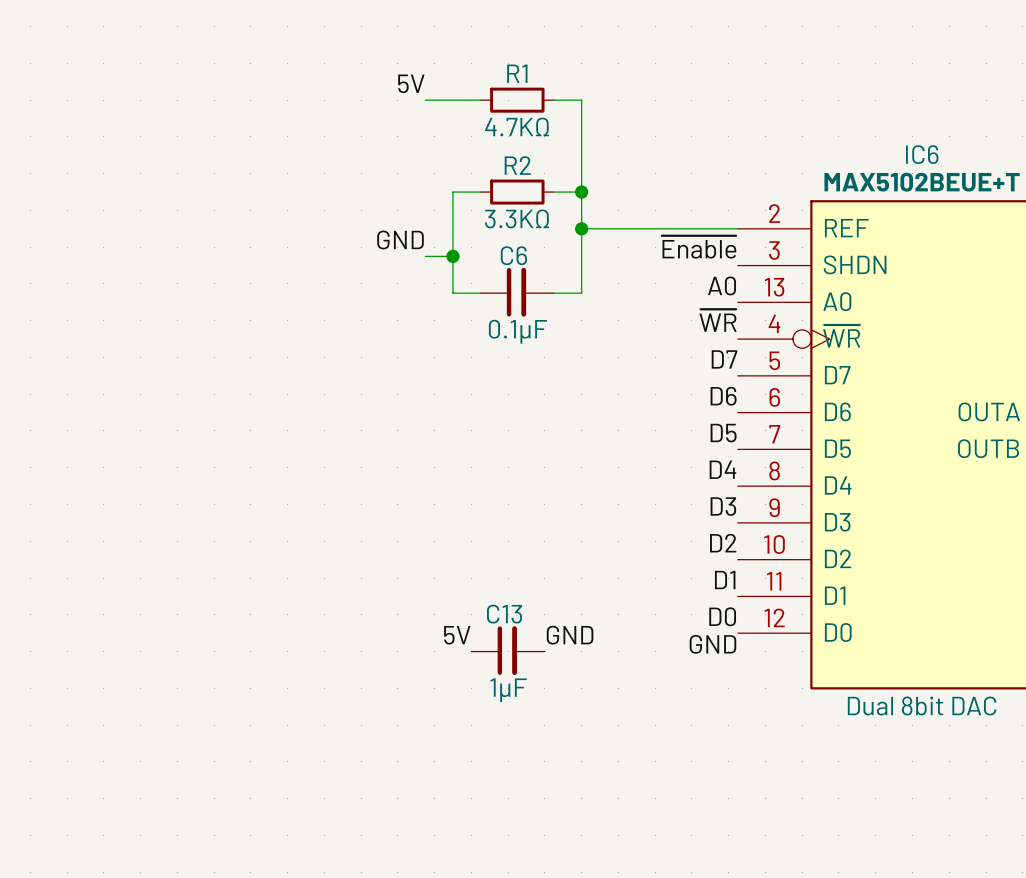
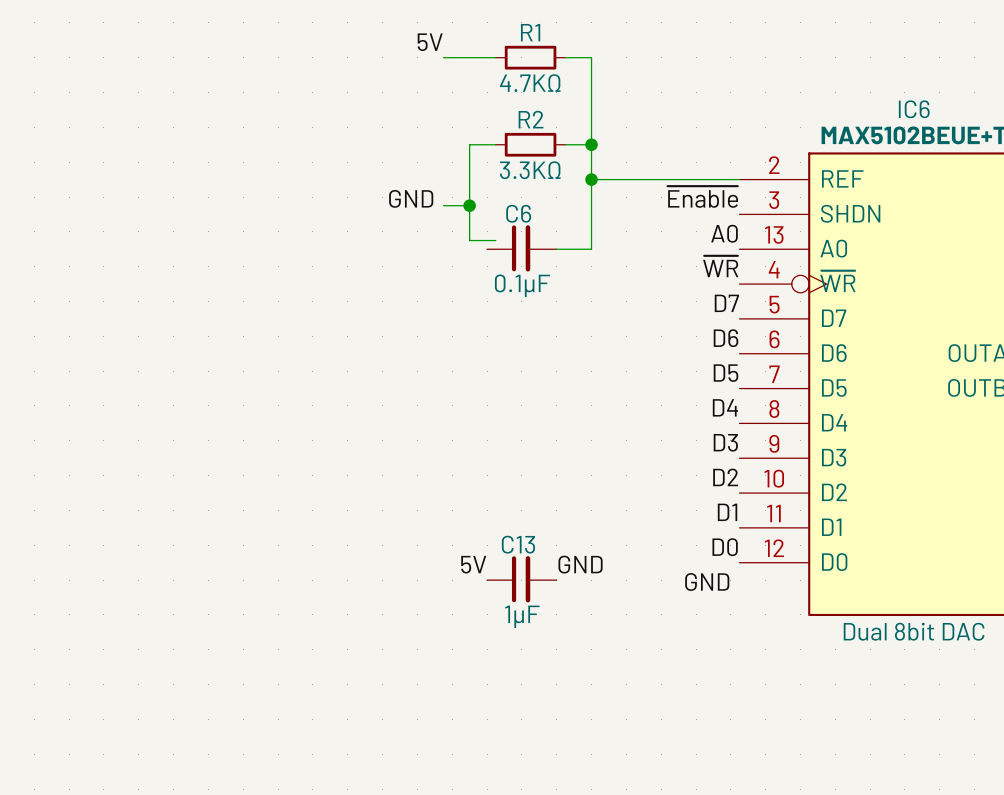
label position: GND (400, 239) -> GND (411, 198)
C6 position: (517, 292) -> (521, 248)
wire: (554, 293) (581, 293) -> (556, 249) (591, 249) (591, 240)
label position: GND (712, 644) -> GND (707, 582)

